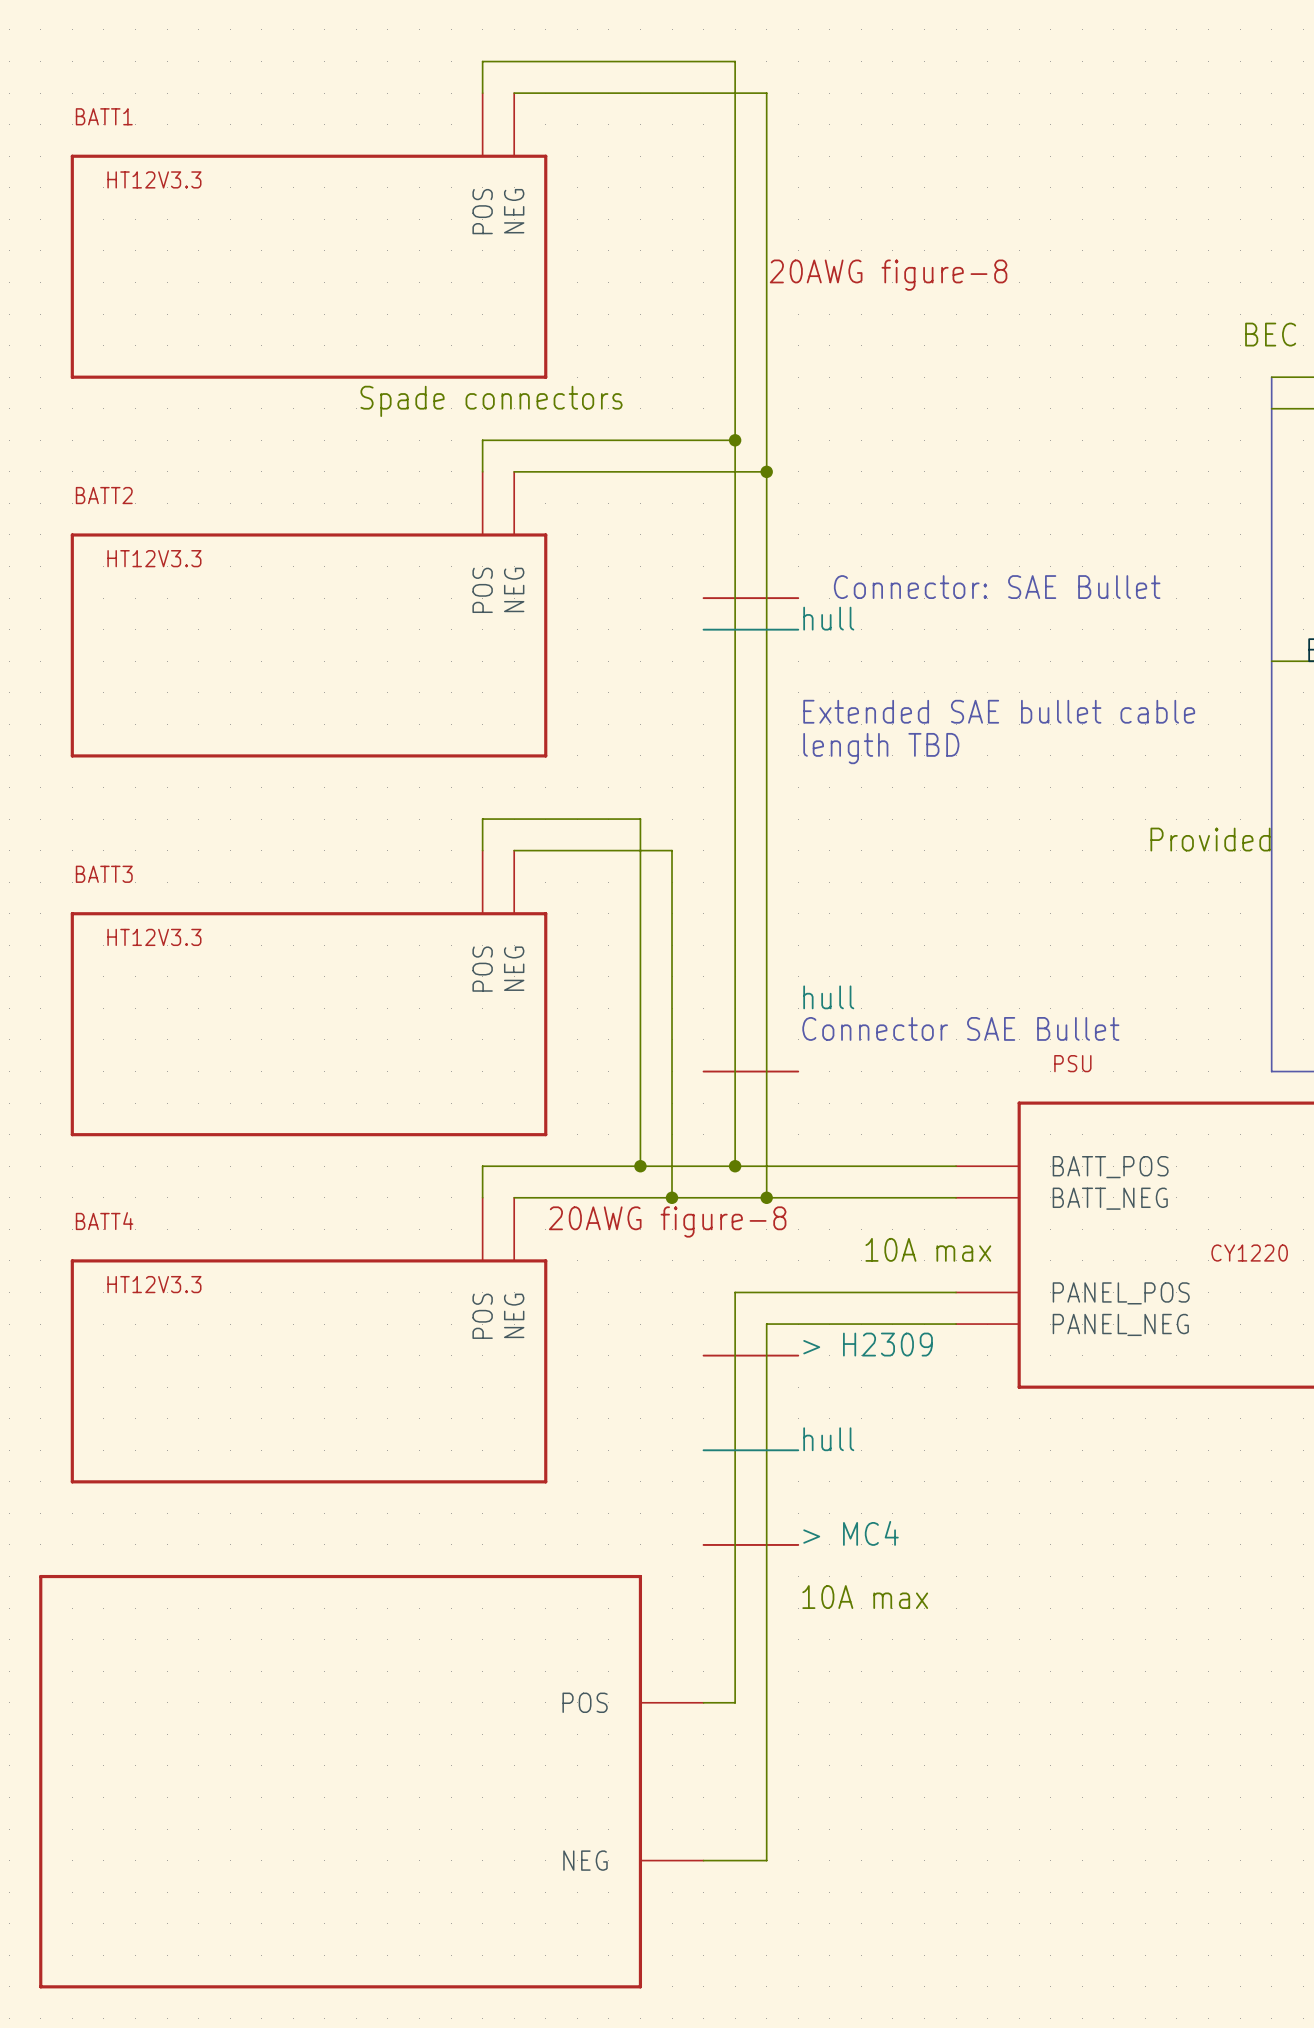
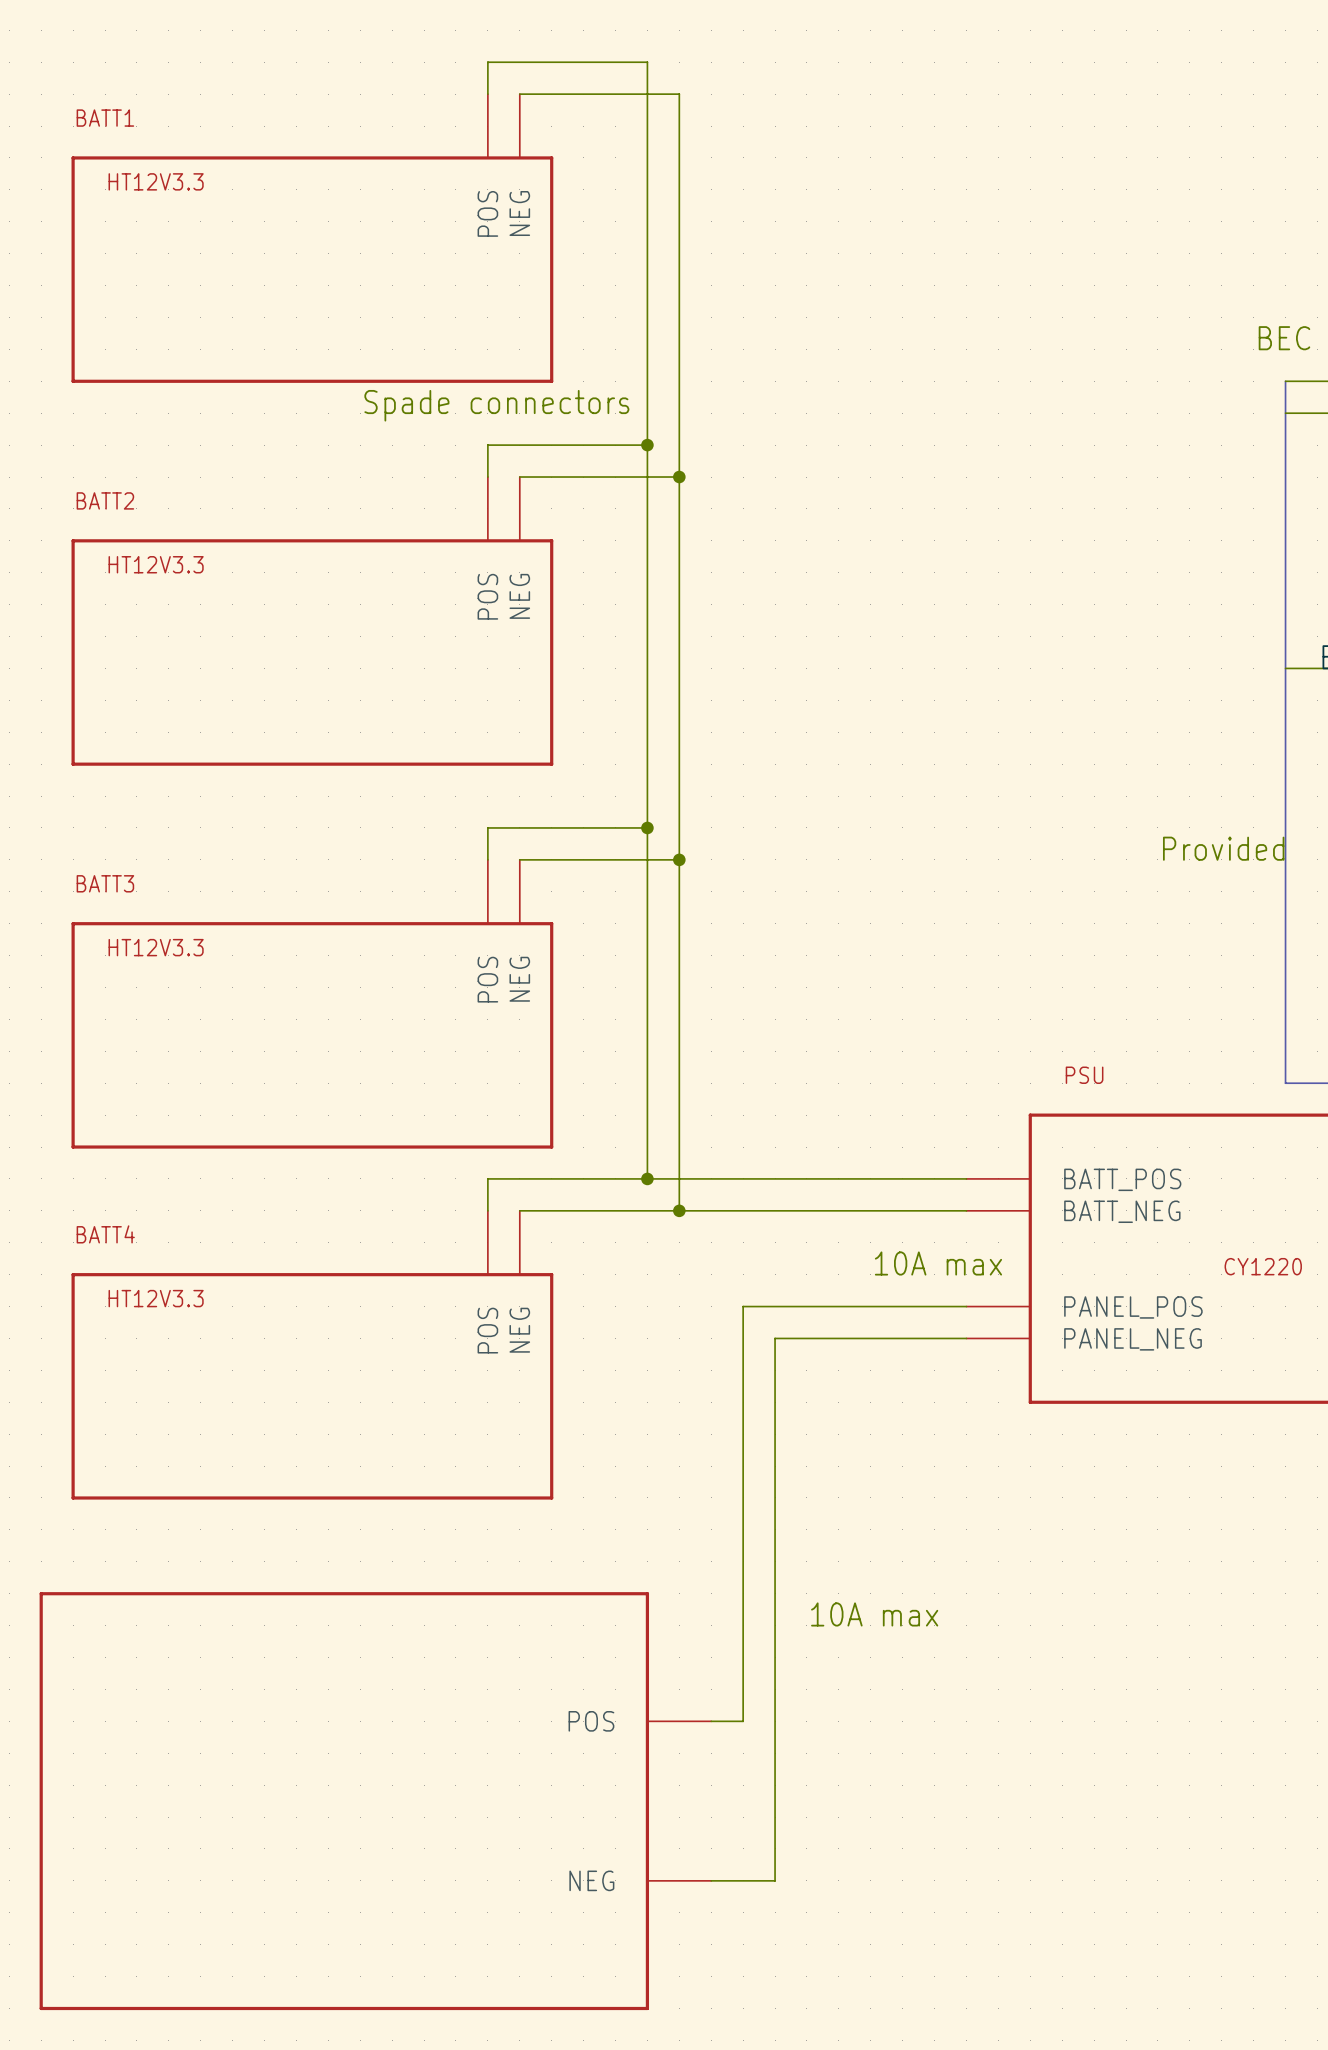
wire: (640, 61) (735, 61) (735, 1166) -> (647, 62) (647, 827)
wire: (672, 93) (766, 93) (766, 1197) -> (679, 94) (679, 859)
text: 20AWG figure-8 (888, 275) -> none
wire: (640, 440) (735, 440) -> none
junction: none -> (647, 445)
junction: (735, 440) -> none
wire: (672, 471) (766, 471) -> none
junction: none -> (679, 477)
junction: (766, 471) -> none
text: Connector: SAE Bullet (997, 587) -> none
line: (703, 598) (798, 598) -> none
text: hull (828, 618) -> none
line: (703, 629) (798, 629) -> none
text: Extended SAE bullet cable (999, 711) -> none
text: length TBD (881, 748) -> none
junction: none -> (647, 827)
junction: none -> (679, 859)
text: hull (828, 997) -> none
text: Connector SAE Bullet (960, 1028) -> none
line: (703, 1071) (798, 1071) -> none
junction: (735, 1166) -> none
junction: (766, 1197) -> none
text: 20AWG figure-8 (667, 1221) -> none
text: > H2309 (868, 1344) -> none
line: (703, 1355) (798, 1355) -> none
text: hull (828, 1439) -> none
line: (703, 1450) (798, 1450) -> none
text: > MC4 (851, 1533) -> none
line: (703, 1544) (798, 1544) -> none

